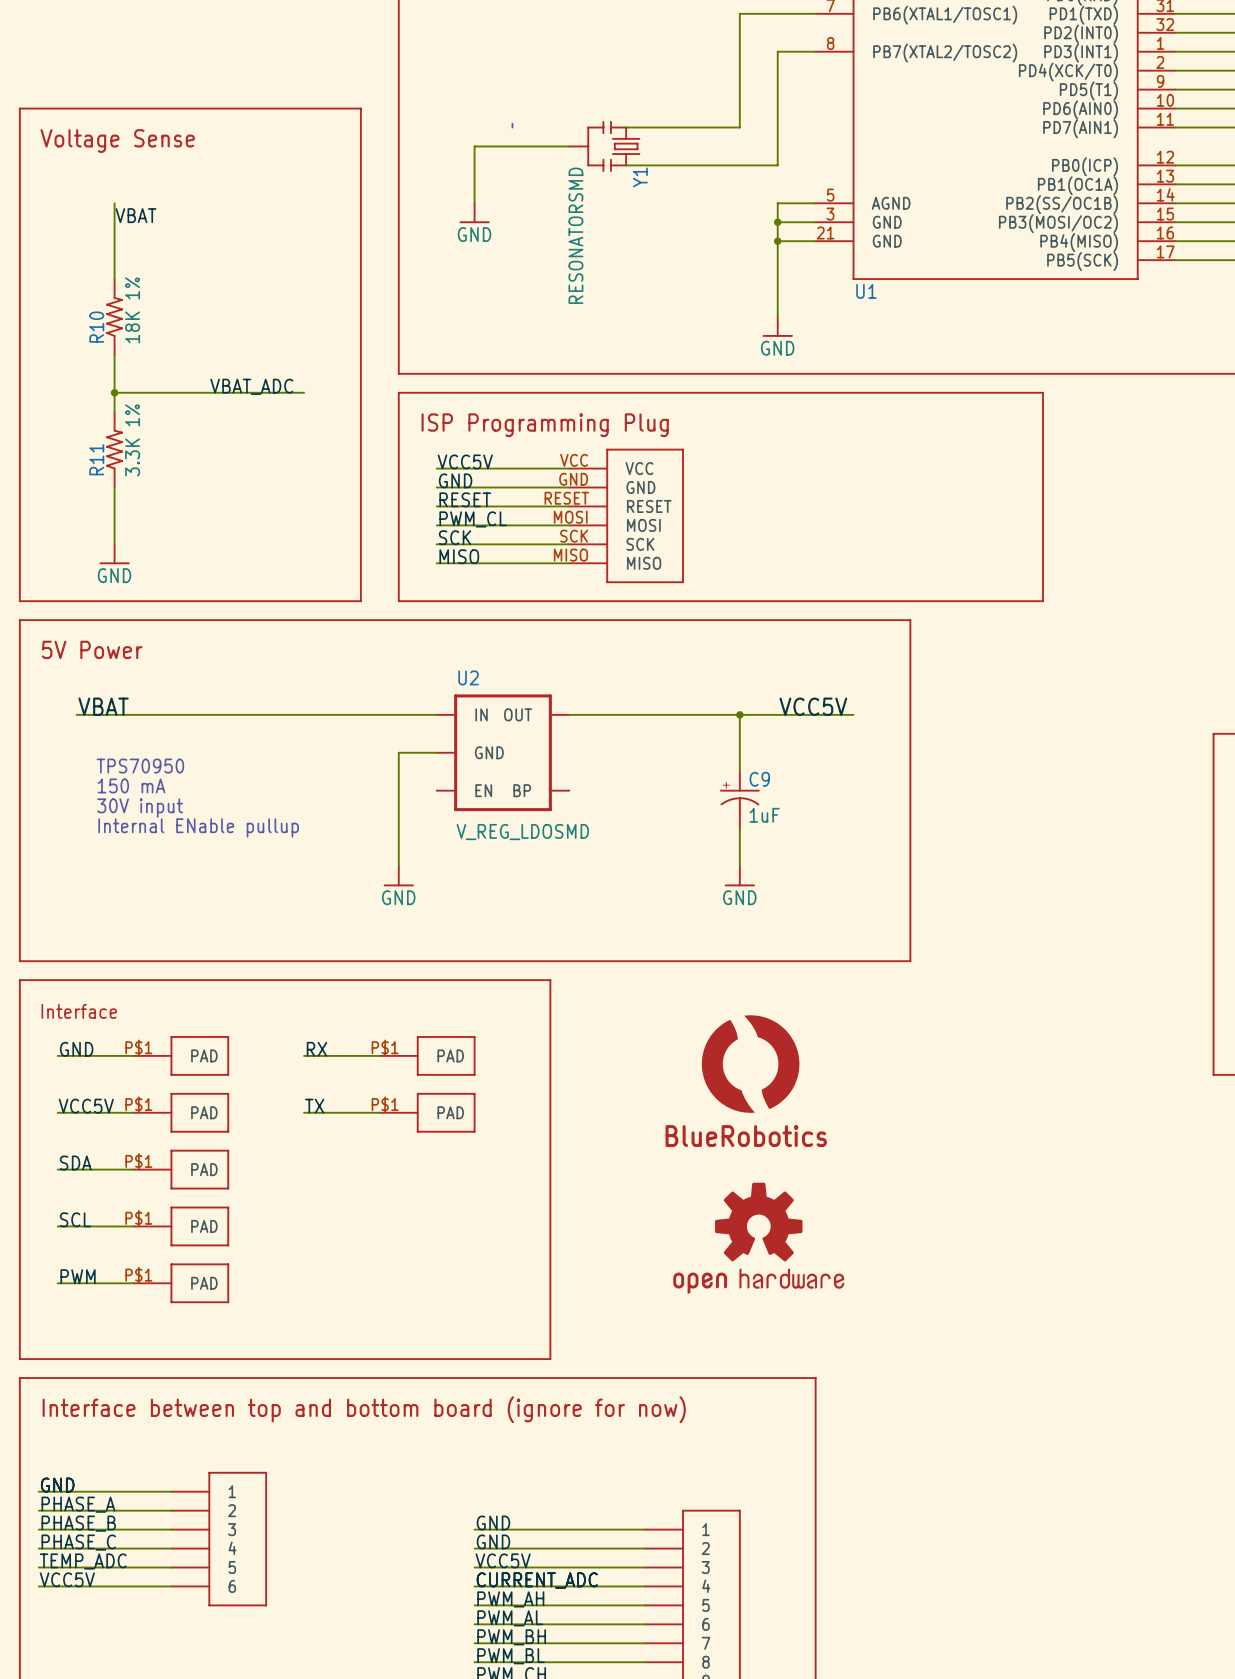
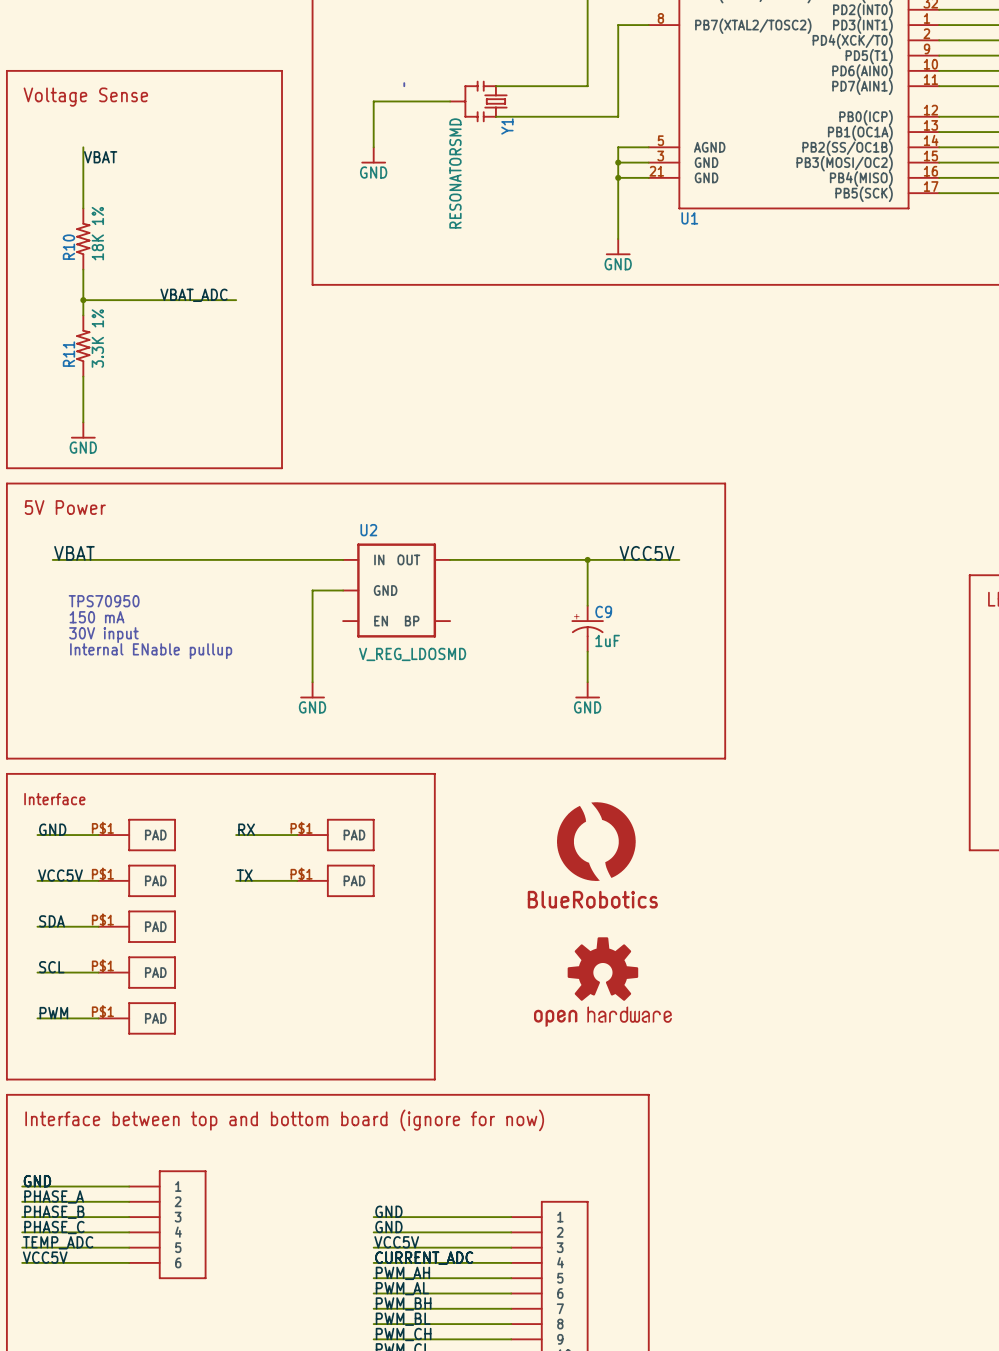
line: (398, 392) (1043, 392) (1043, 601) (398, 601) (398, 392) -> none
text: ISP Programming Plug (545, 425) -> none
label: VCC5V (465, 461) -> none
wire: (436, 468) (569, 468) -> none
label: GND (455, 480) -> none
wire: (436, 487) (569, 487) -> none
label: RESET (465, 499) -> none
wire: (436, 506) (569, 506) -> none
part: (626, 515) -> none
label: PWM_CL (473, 519) -> none
wire: (436, 525) (569, 525) -> none
label: SCK (455, 537) -> none
wire: (436, 544) (569, 544) -> none
label: MISO (459, 556) -> none
wire: (436, 563) (569, 563) -> none

